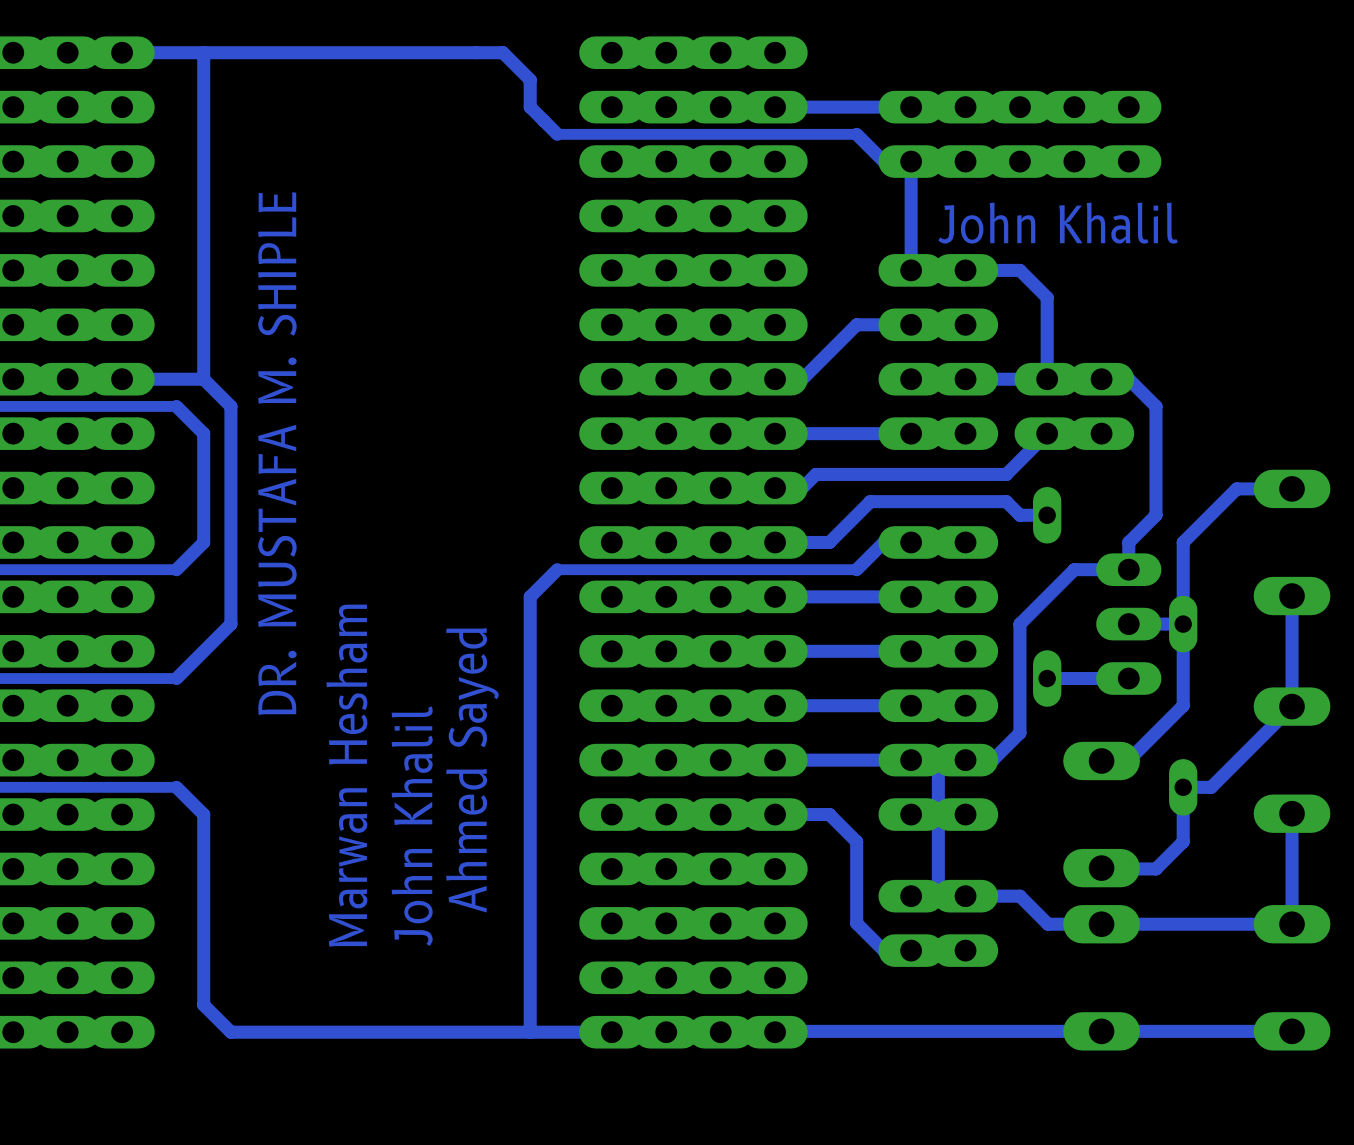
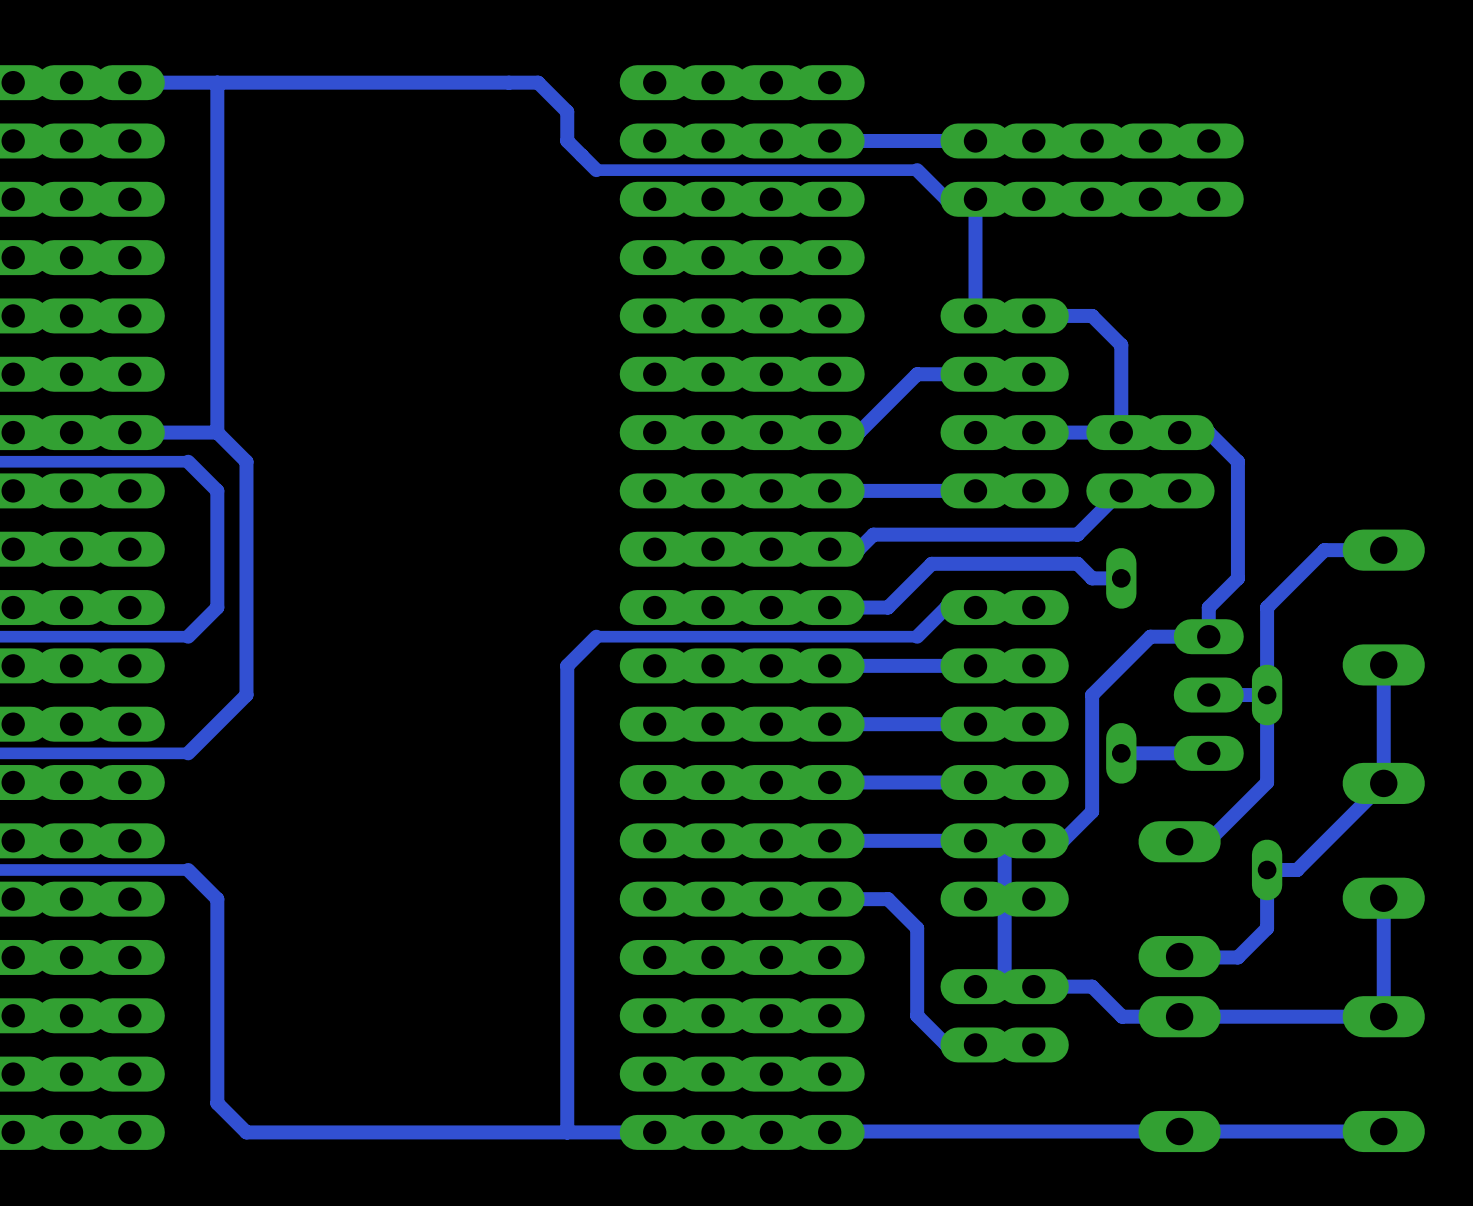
text: John Khalil (1058, 223) -> none
text: DR. MUSTAFA M. SHIPLE (277, 453) -> none
text: Ahmed Sayed (472, 770) -> none
text: Marwan Hesham (346, 775) -> none
text: John Khalil (412, 826) -> none

